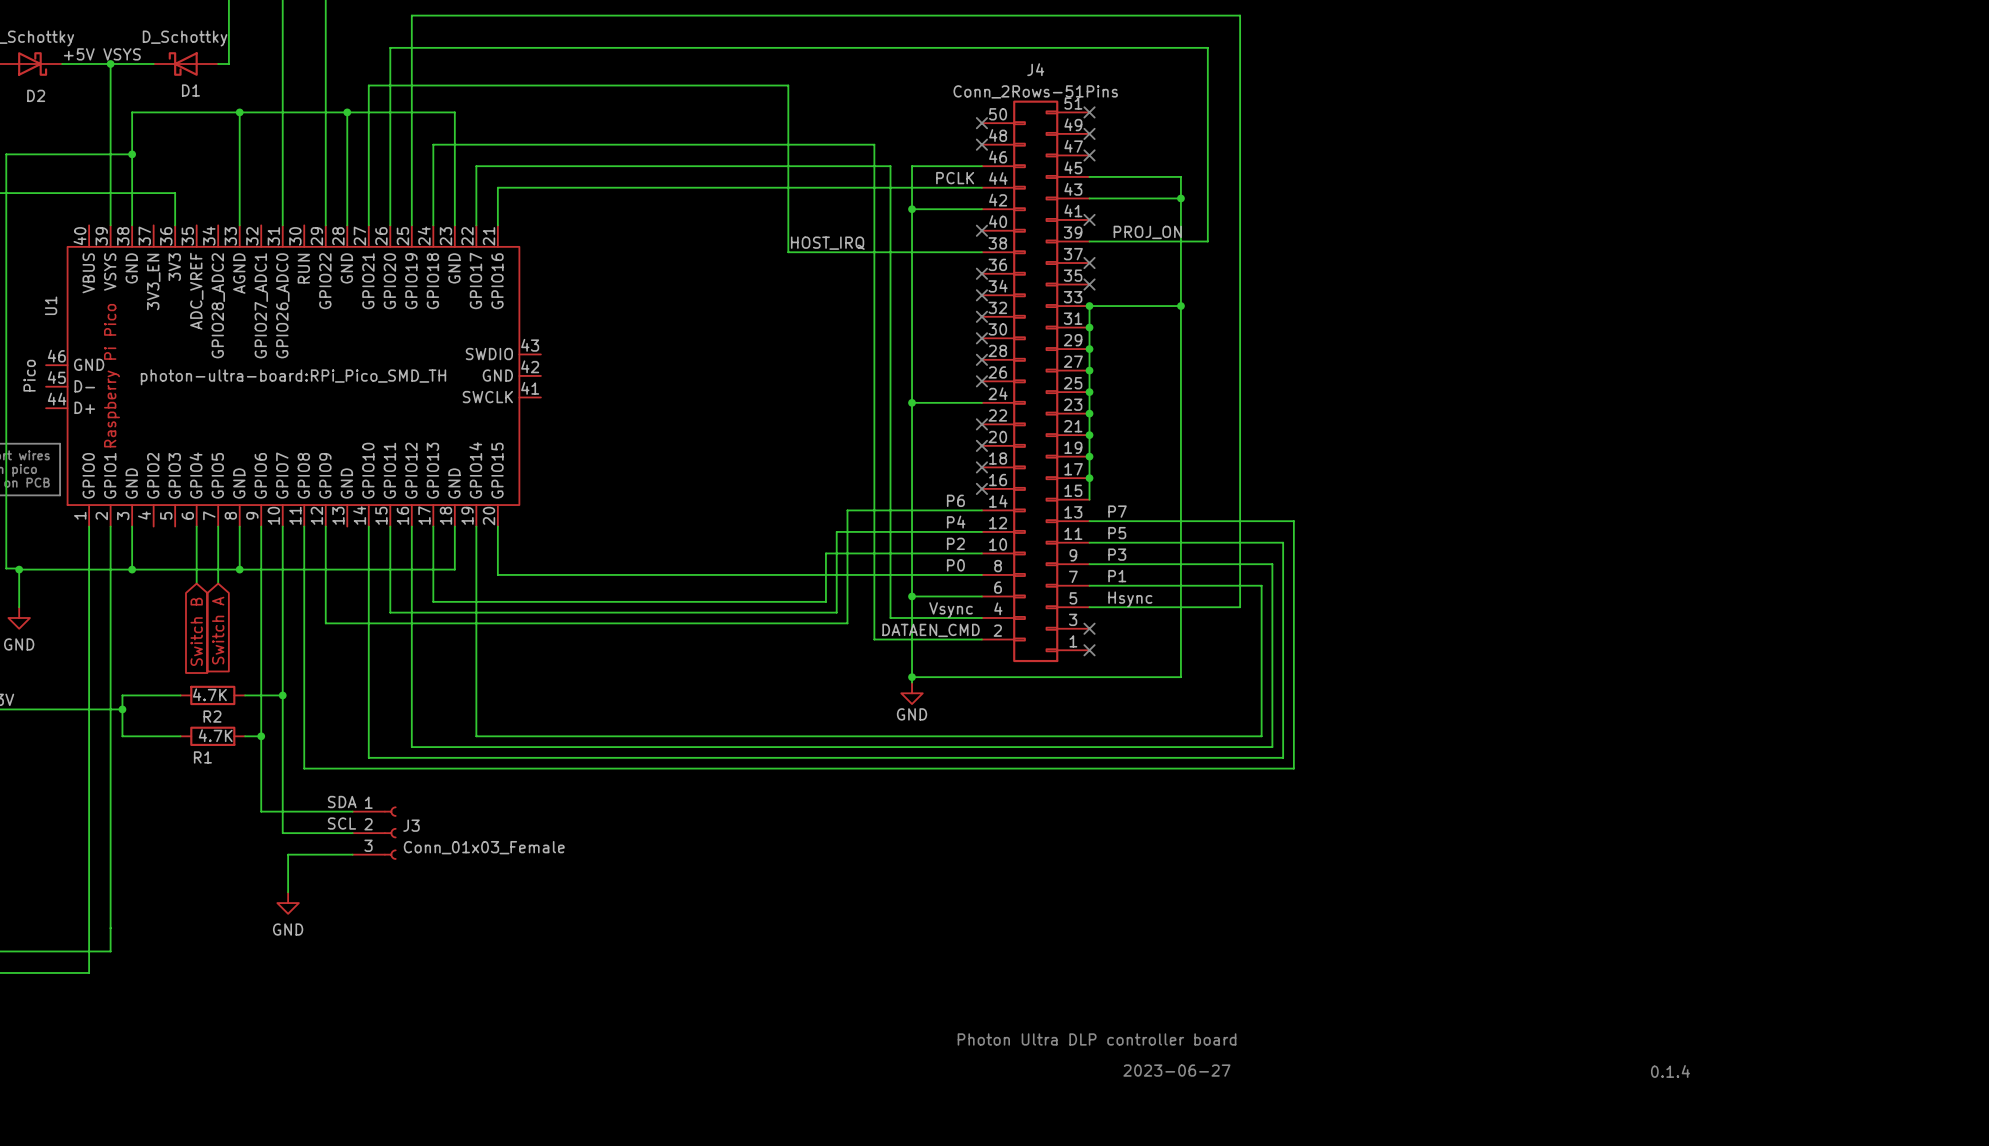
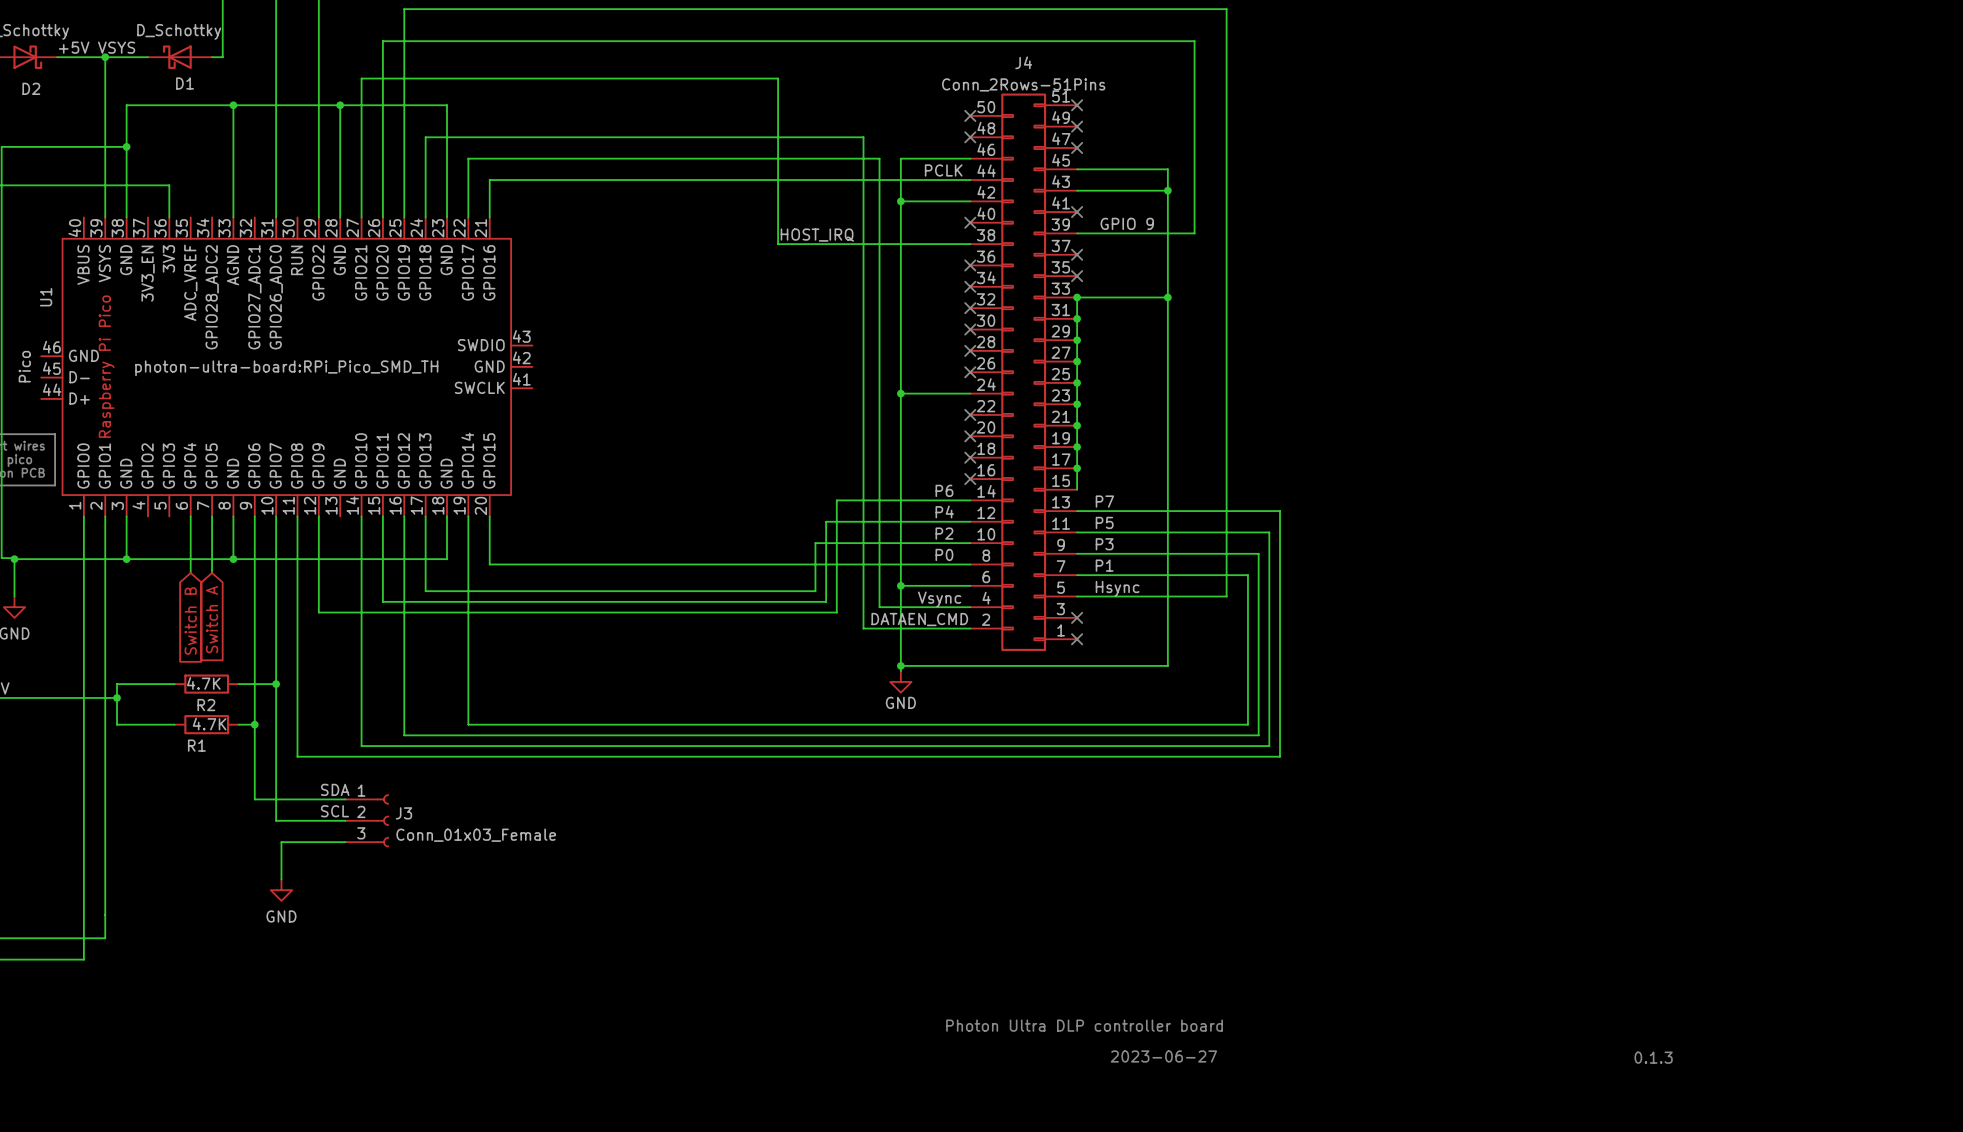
label: PROJ_ON (1147, 232) -> GPIO 9 (1127, 223)
text: 0.1.4 (1670, 1071) -> 0.1.3 (1653, 1057)

